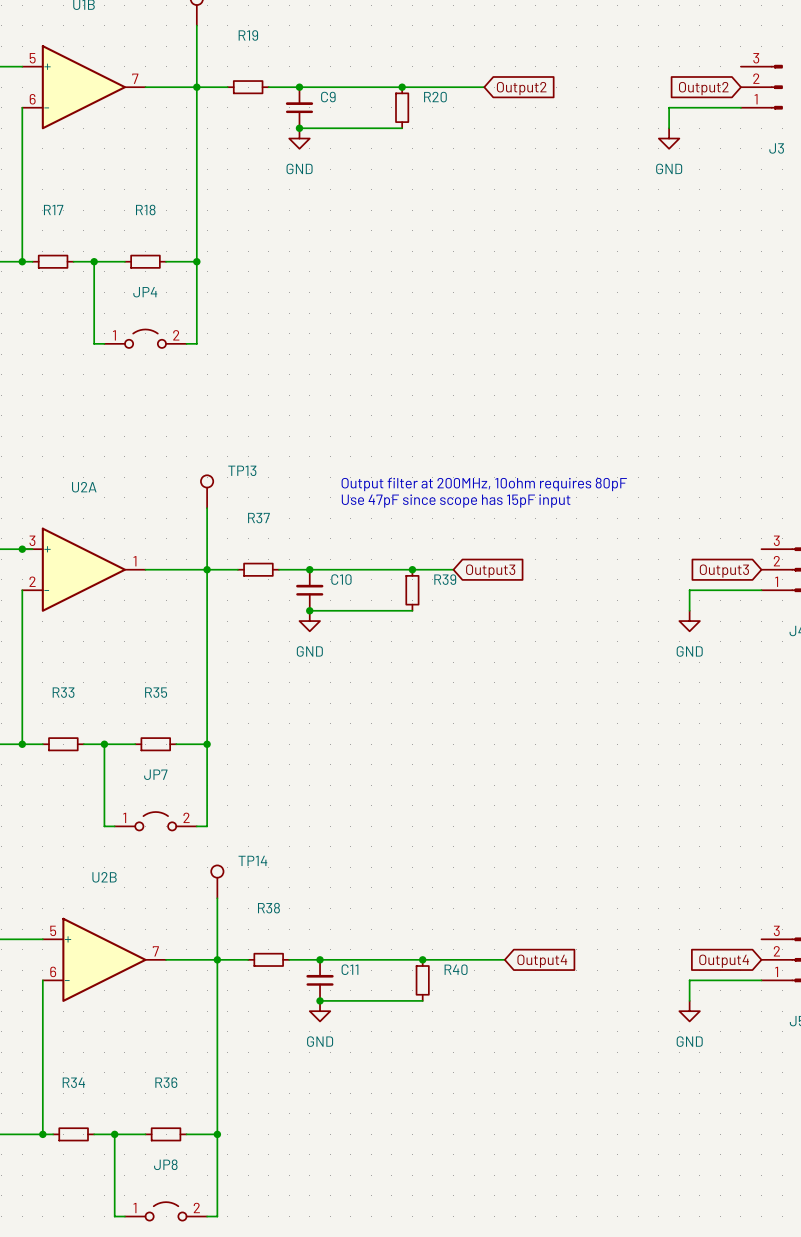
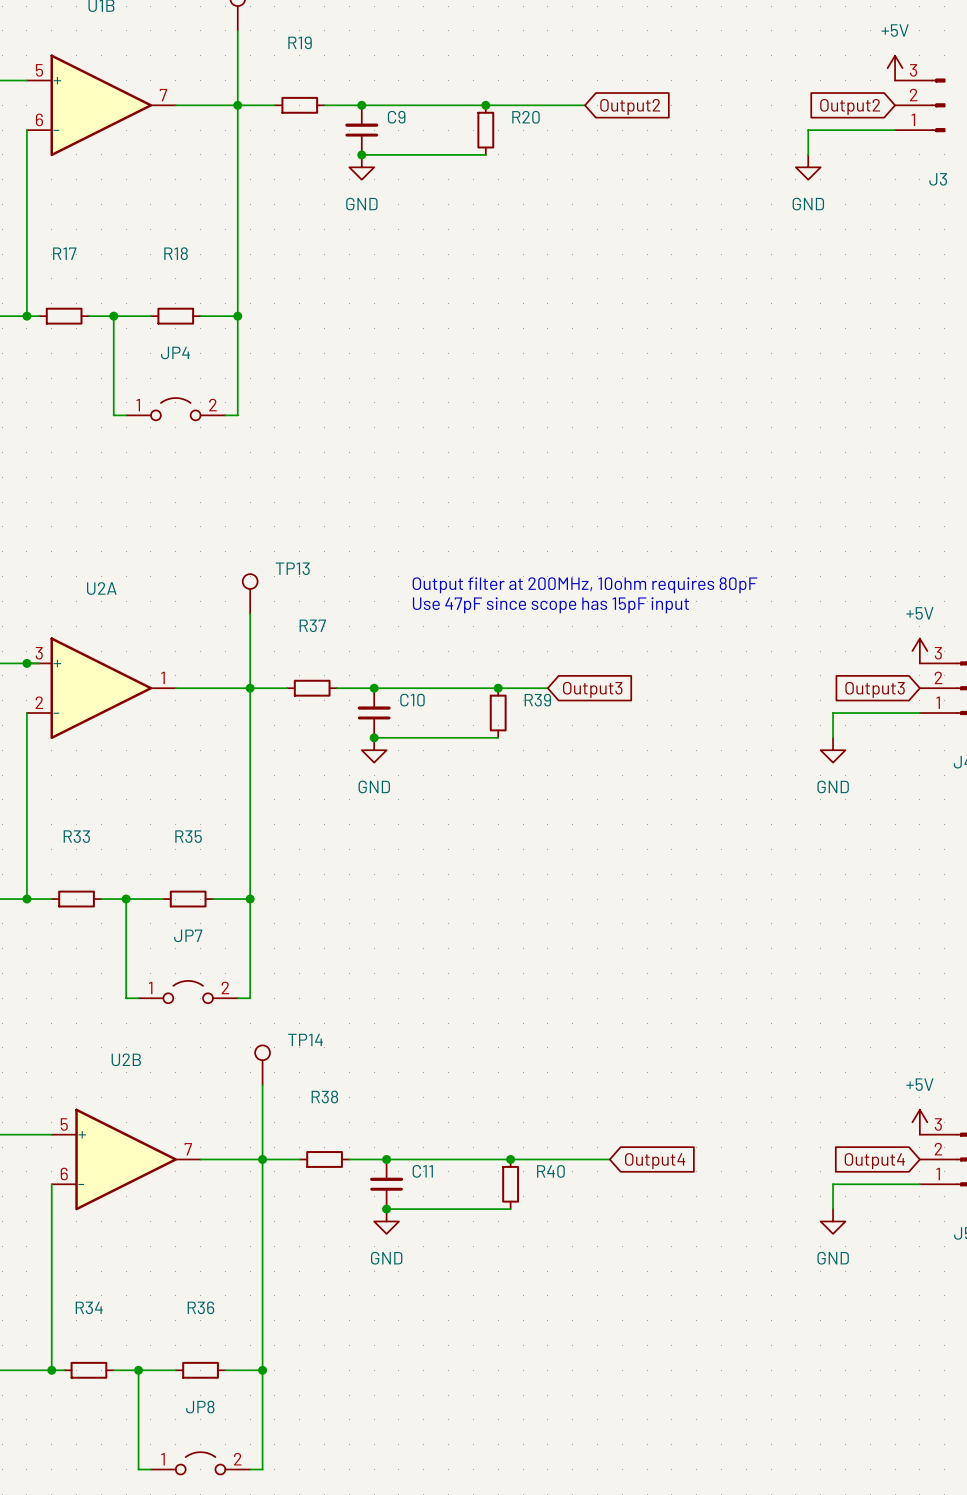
power symbol: none -> +5V (895, 68)
power symbol: none -> +5V (919, 651)
power symbol: none -> +5V (919, 1122)

